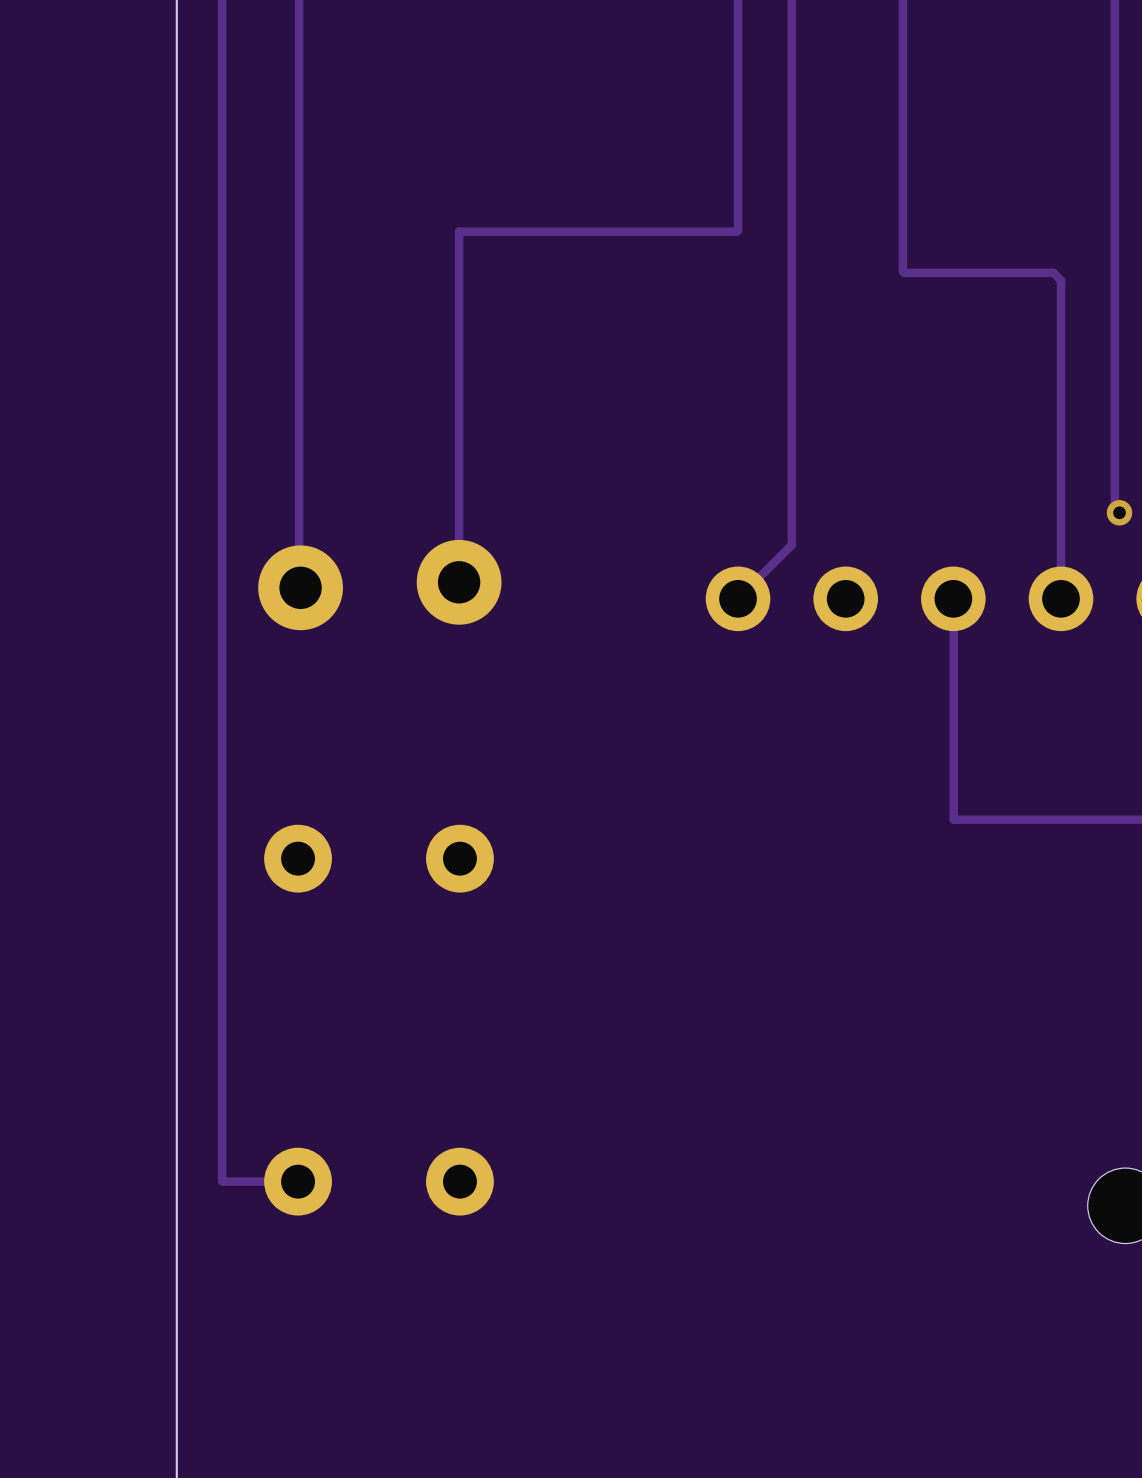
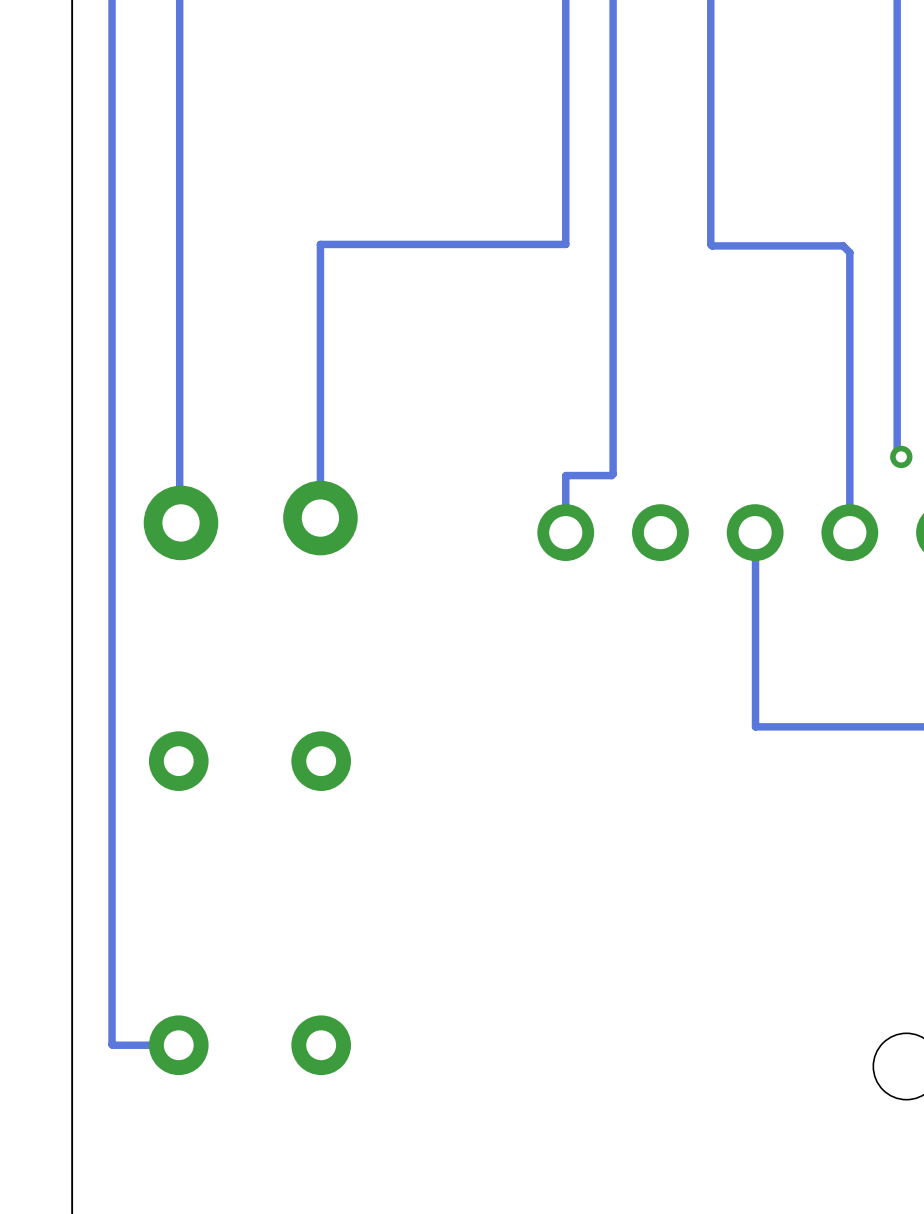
track: (738, 230) (459, 231) (459, 271) -> (565, 208) (565, 244) (320, 244)
track: (791, 532) (791, 544) (738, 598) -> (565, 475) (565, 532)
track: none -> (613, 474) (566, 475)

